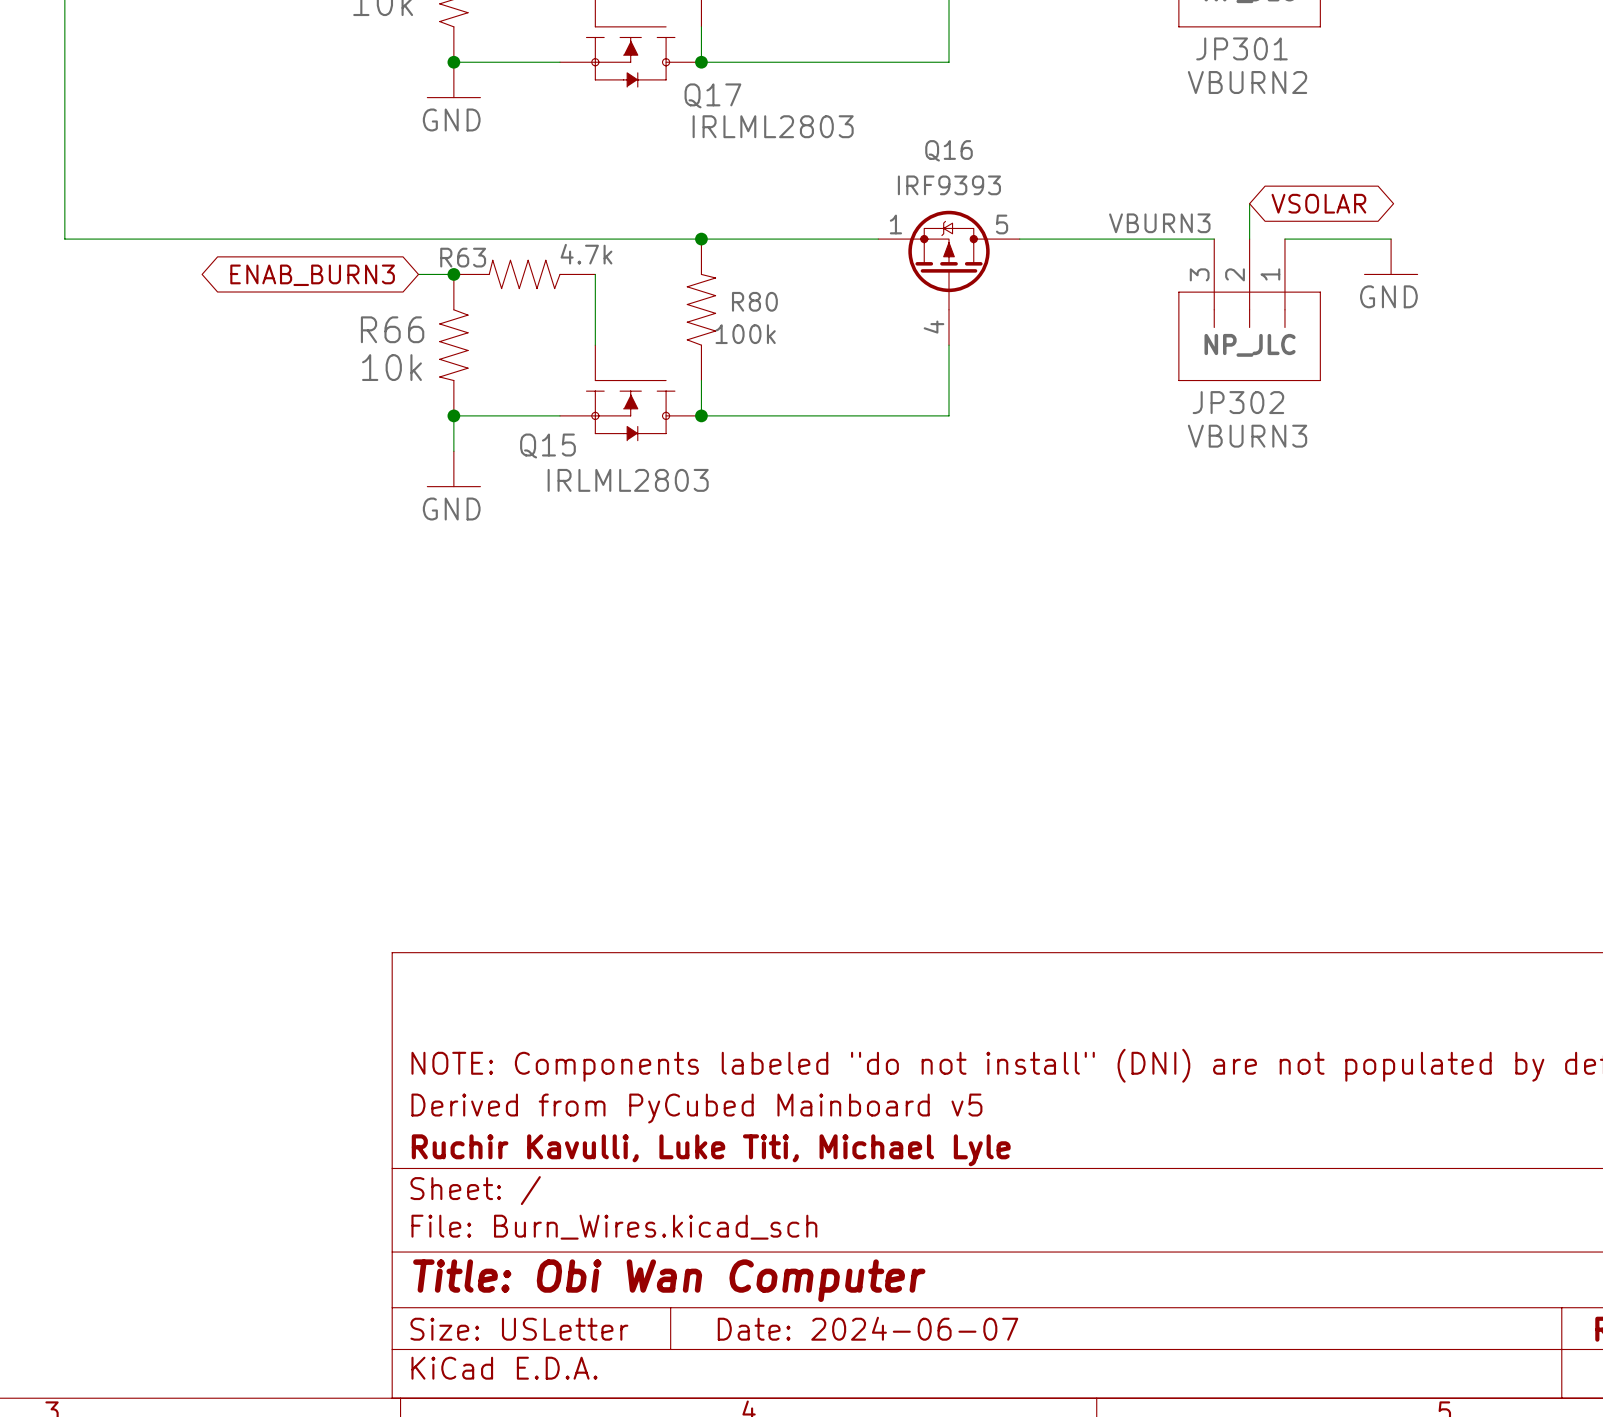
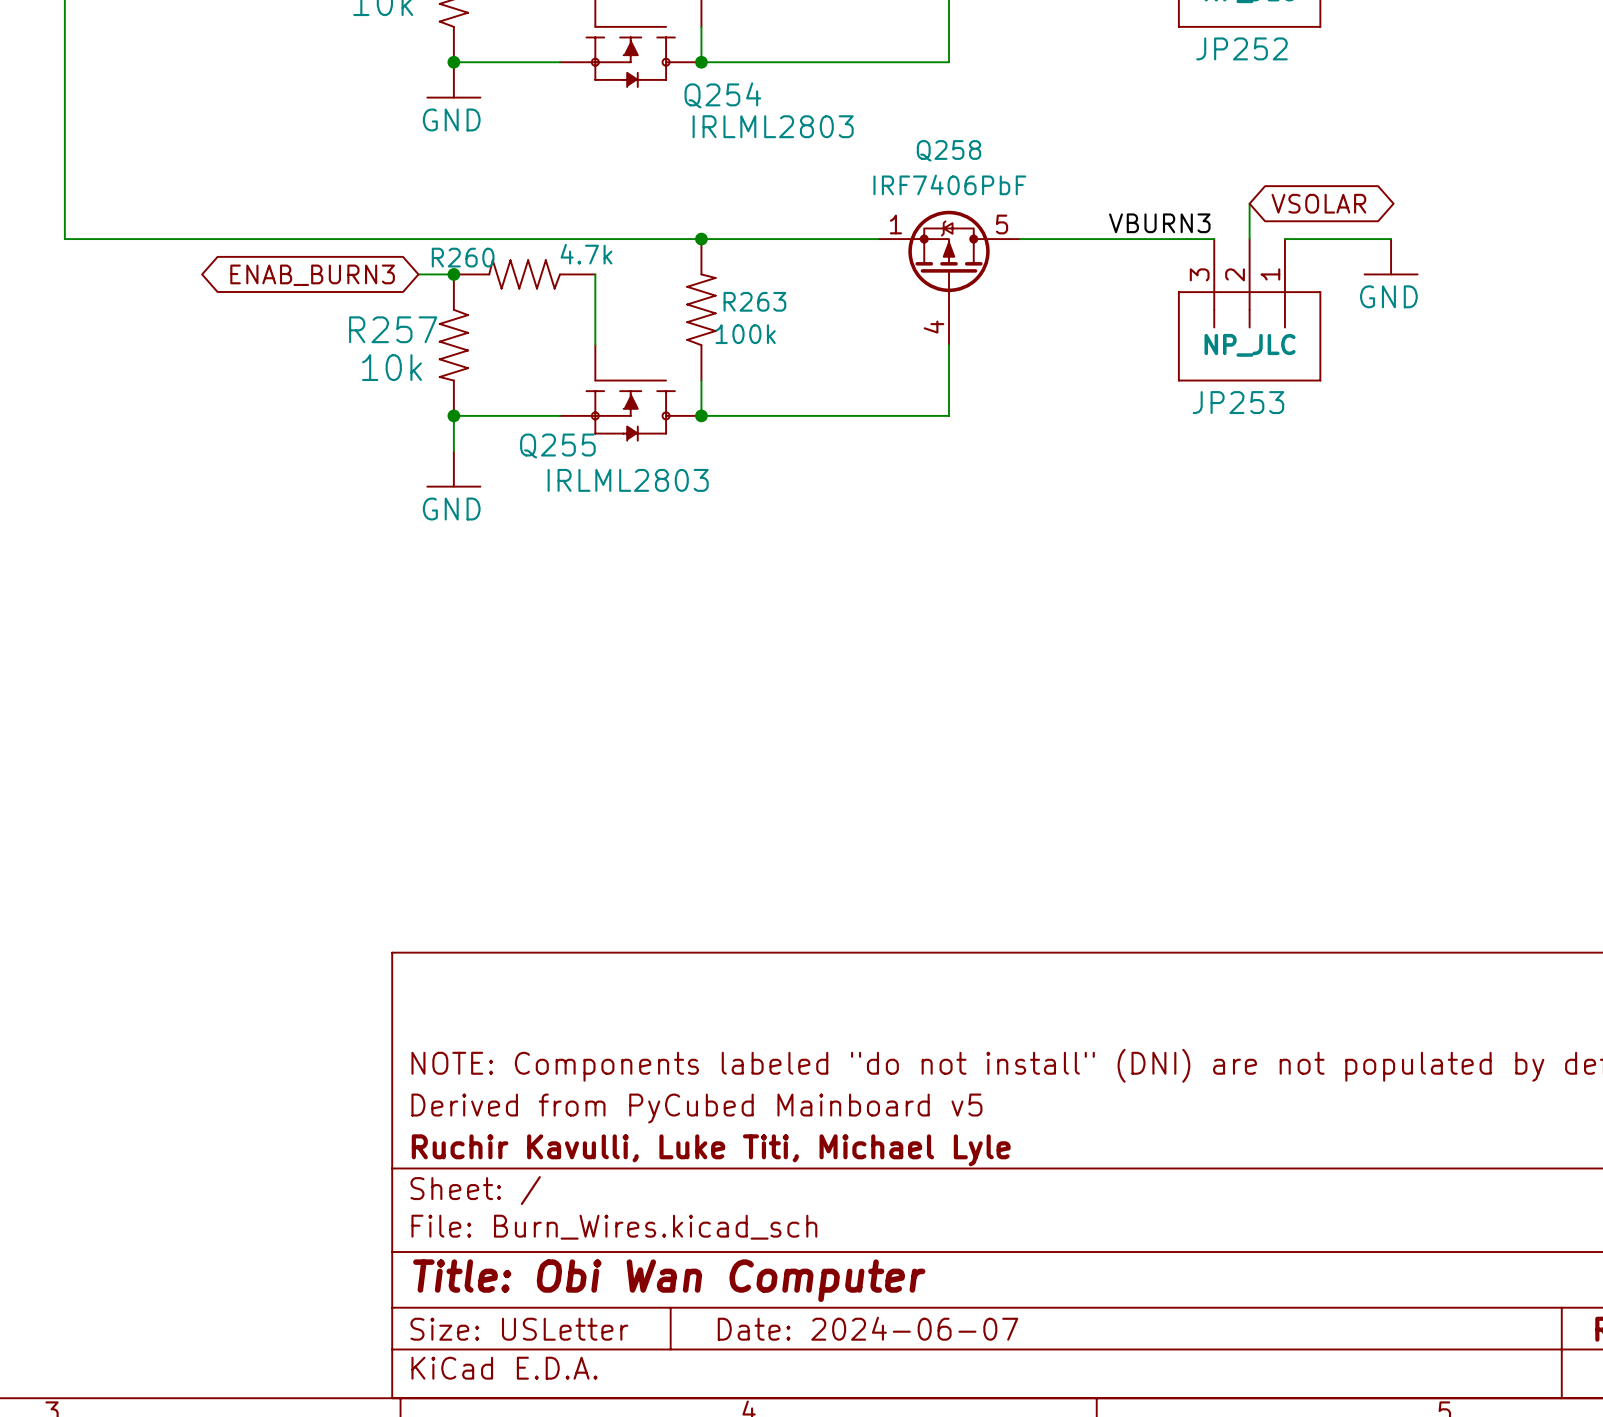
JP301 name: JP301 (1241, 48) -> JP252 (1241, 48)
JP301 value: VBURN2 (1247, 82) -> none
Q17 name: Q17 (712, 95) -> Q254 (722, 95)
Q16 name: Q16 (949, 150) -> Q258 (949, 150)
Q16 value: IRF9393 (949, 185) -> IRF7406PbF (949, 184)
R63 name: R63 (463, 257) -> R260 (463, 257)
R80 name: R80 (754, 301) -> R263 (754, 301)
R66 name: R66 (392, 329) -> R257 (393, 329)
JP302 name: JP302 (1238, 402) -> JP253 (1238, 402)
JP302 value: VBURN3 (1247, 436) -> none
Q15 name: Q15 (547, 446) -> Q255 (557, 446)

